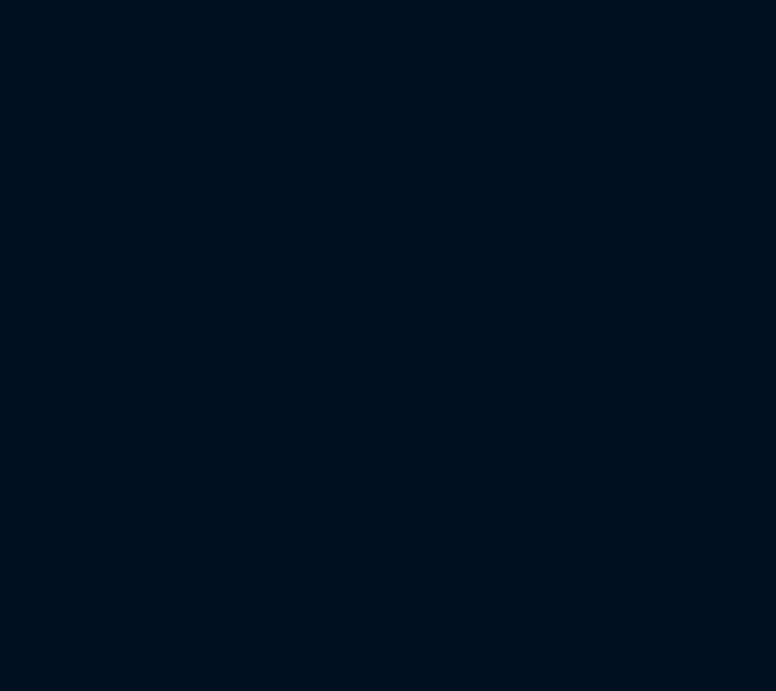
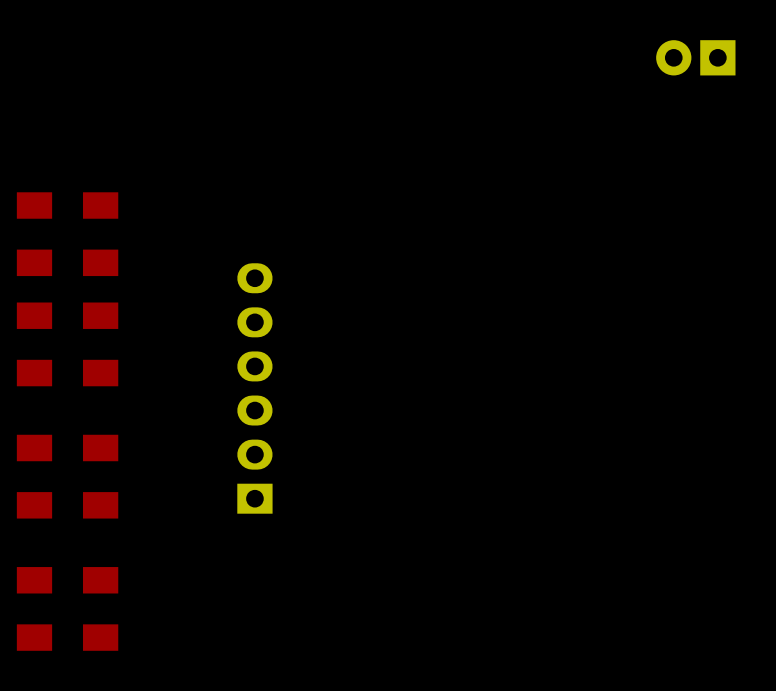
part: none -> (695, 57)
part: none -> (34, 234)
part: none -> (100, 234)
part: none -> (34, 344)
part: none -> (100, 344)
part: none -> (254, 388)
part: none -> (34, 476)
part: none -> (100, 476)
part: none -> (34, 608)
part: none -> (100, 608)

